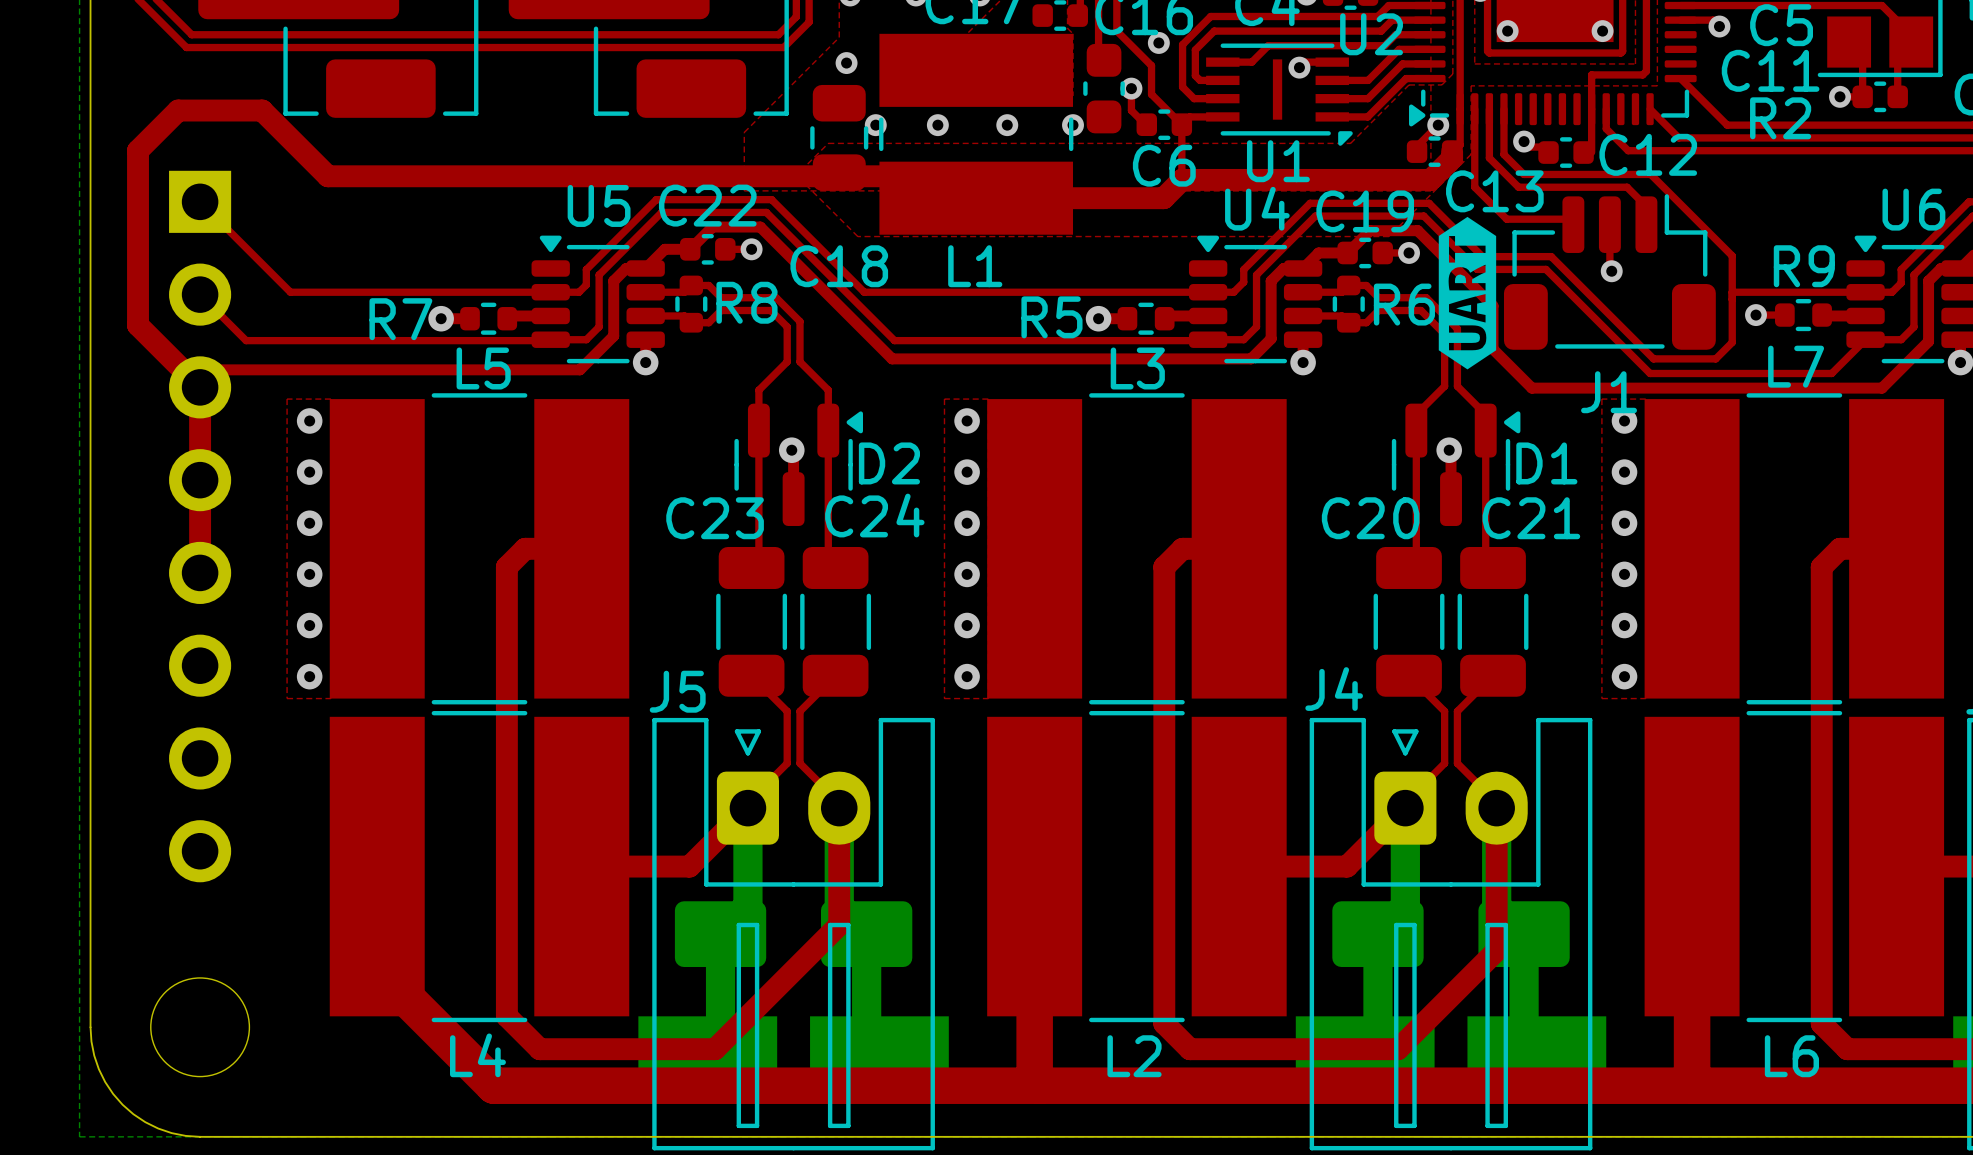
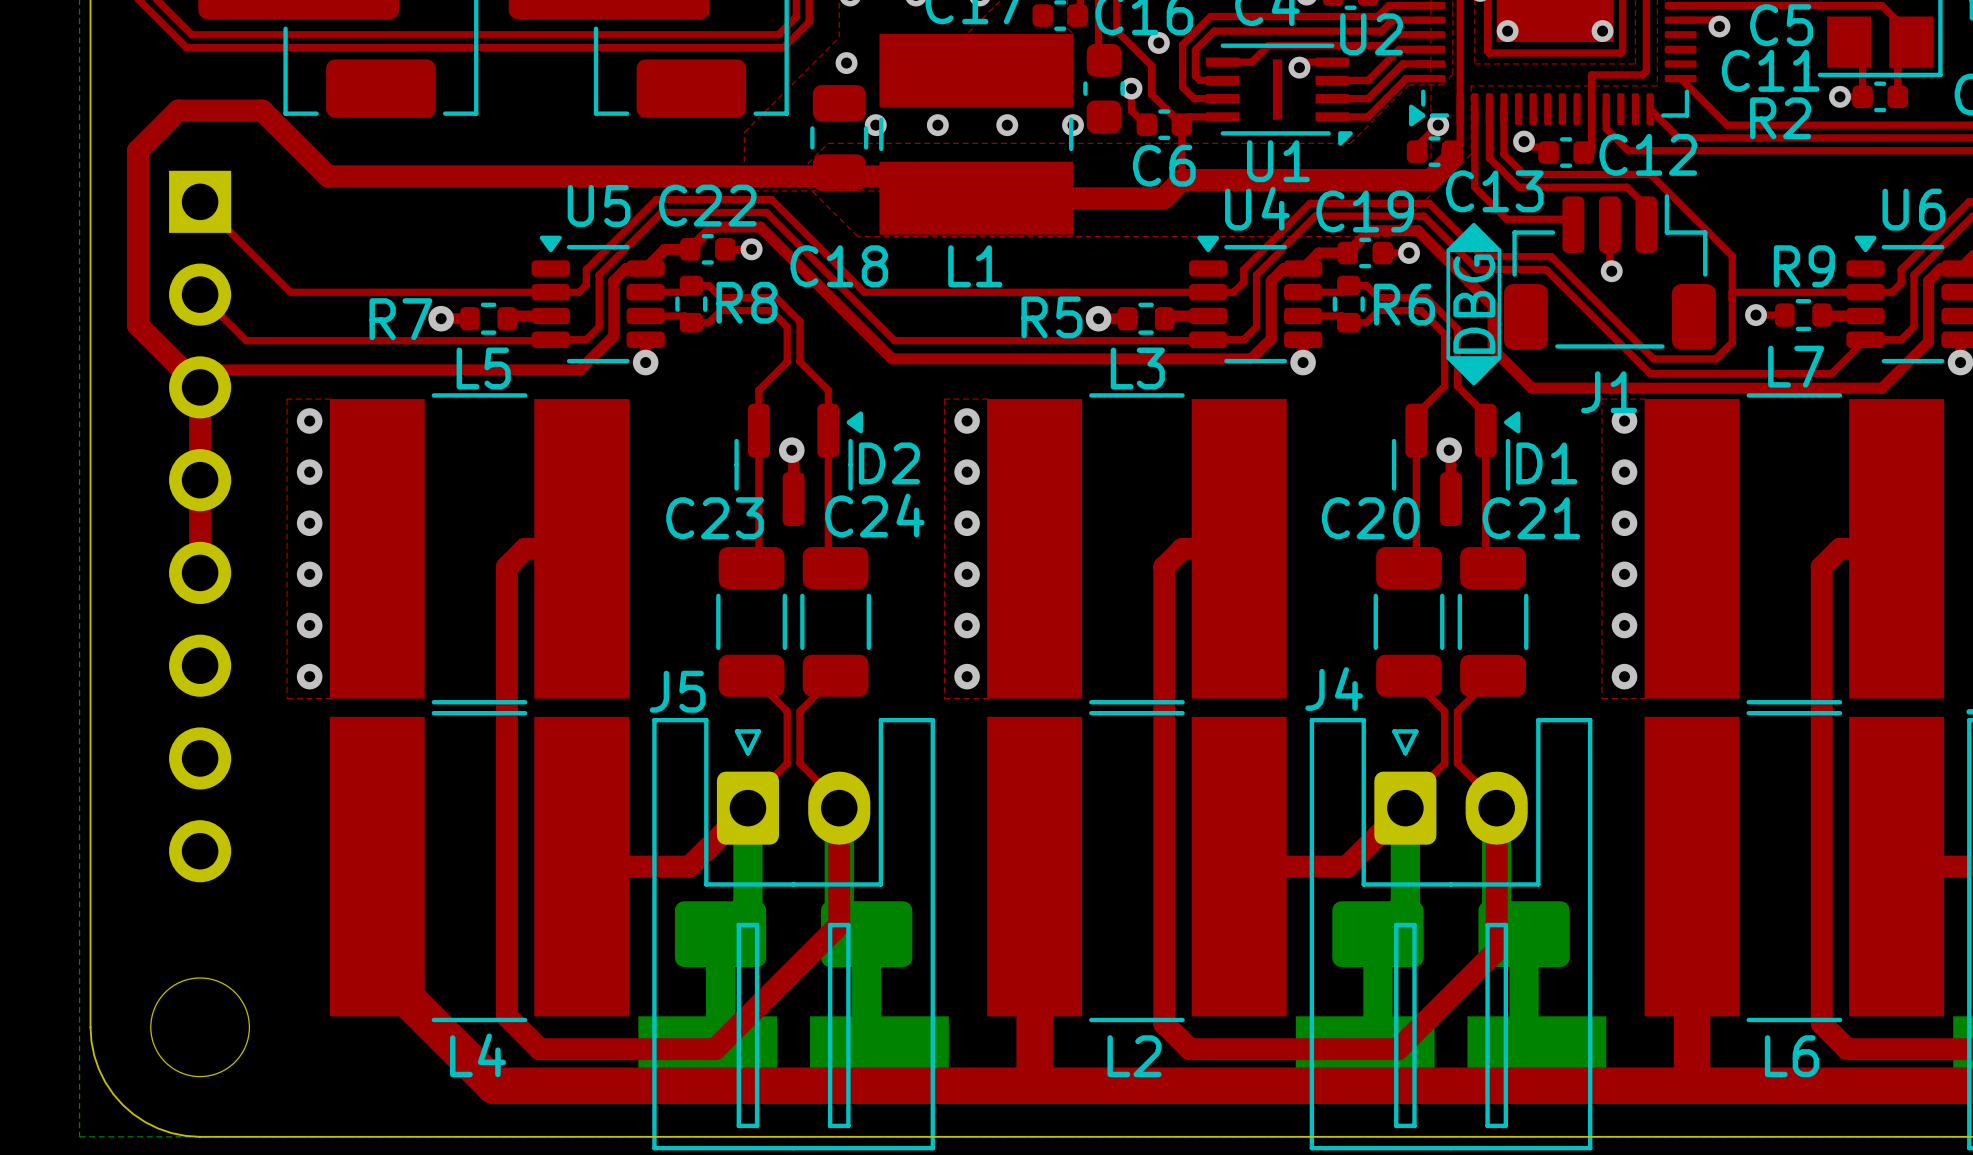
drawing: [1438, 216, 1497, 370] -> none
drawing: none -> [1446, 222, 1502, 253]
line: none -> (1448, 250) (1448, 357)
line: none -> (1499, 250) (1499, 357)
text: none -> DBG (1474, 304)
drawing: none -> [1446, 356, 1502, 386]

